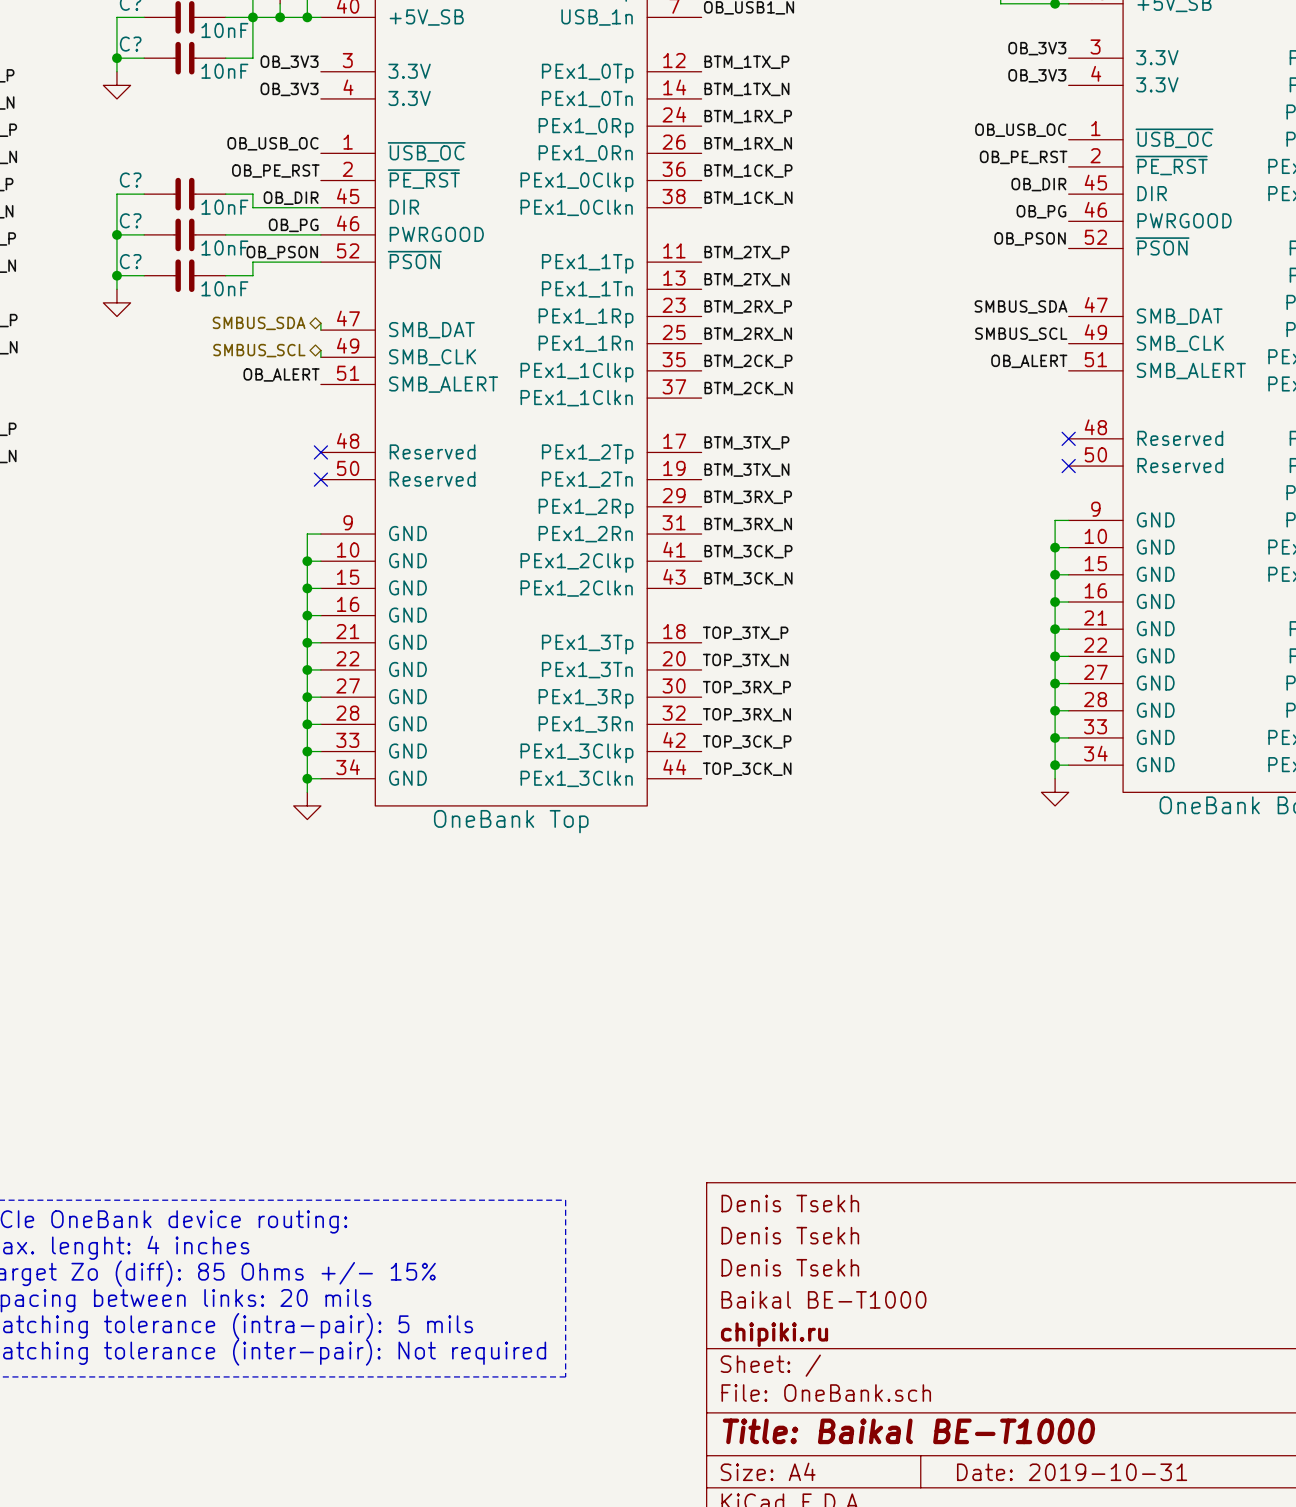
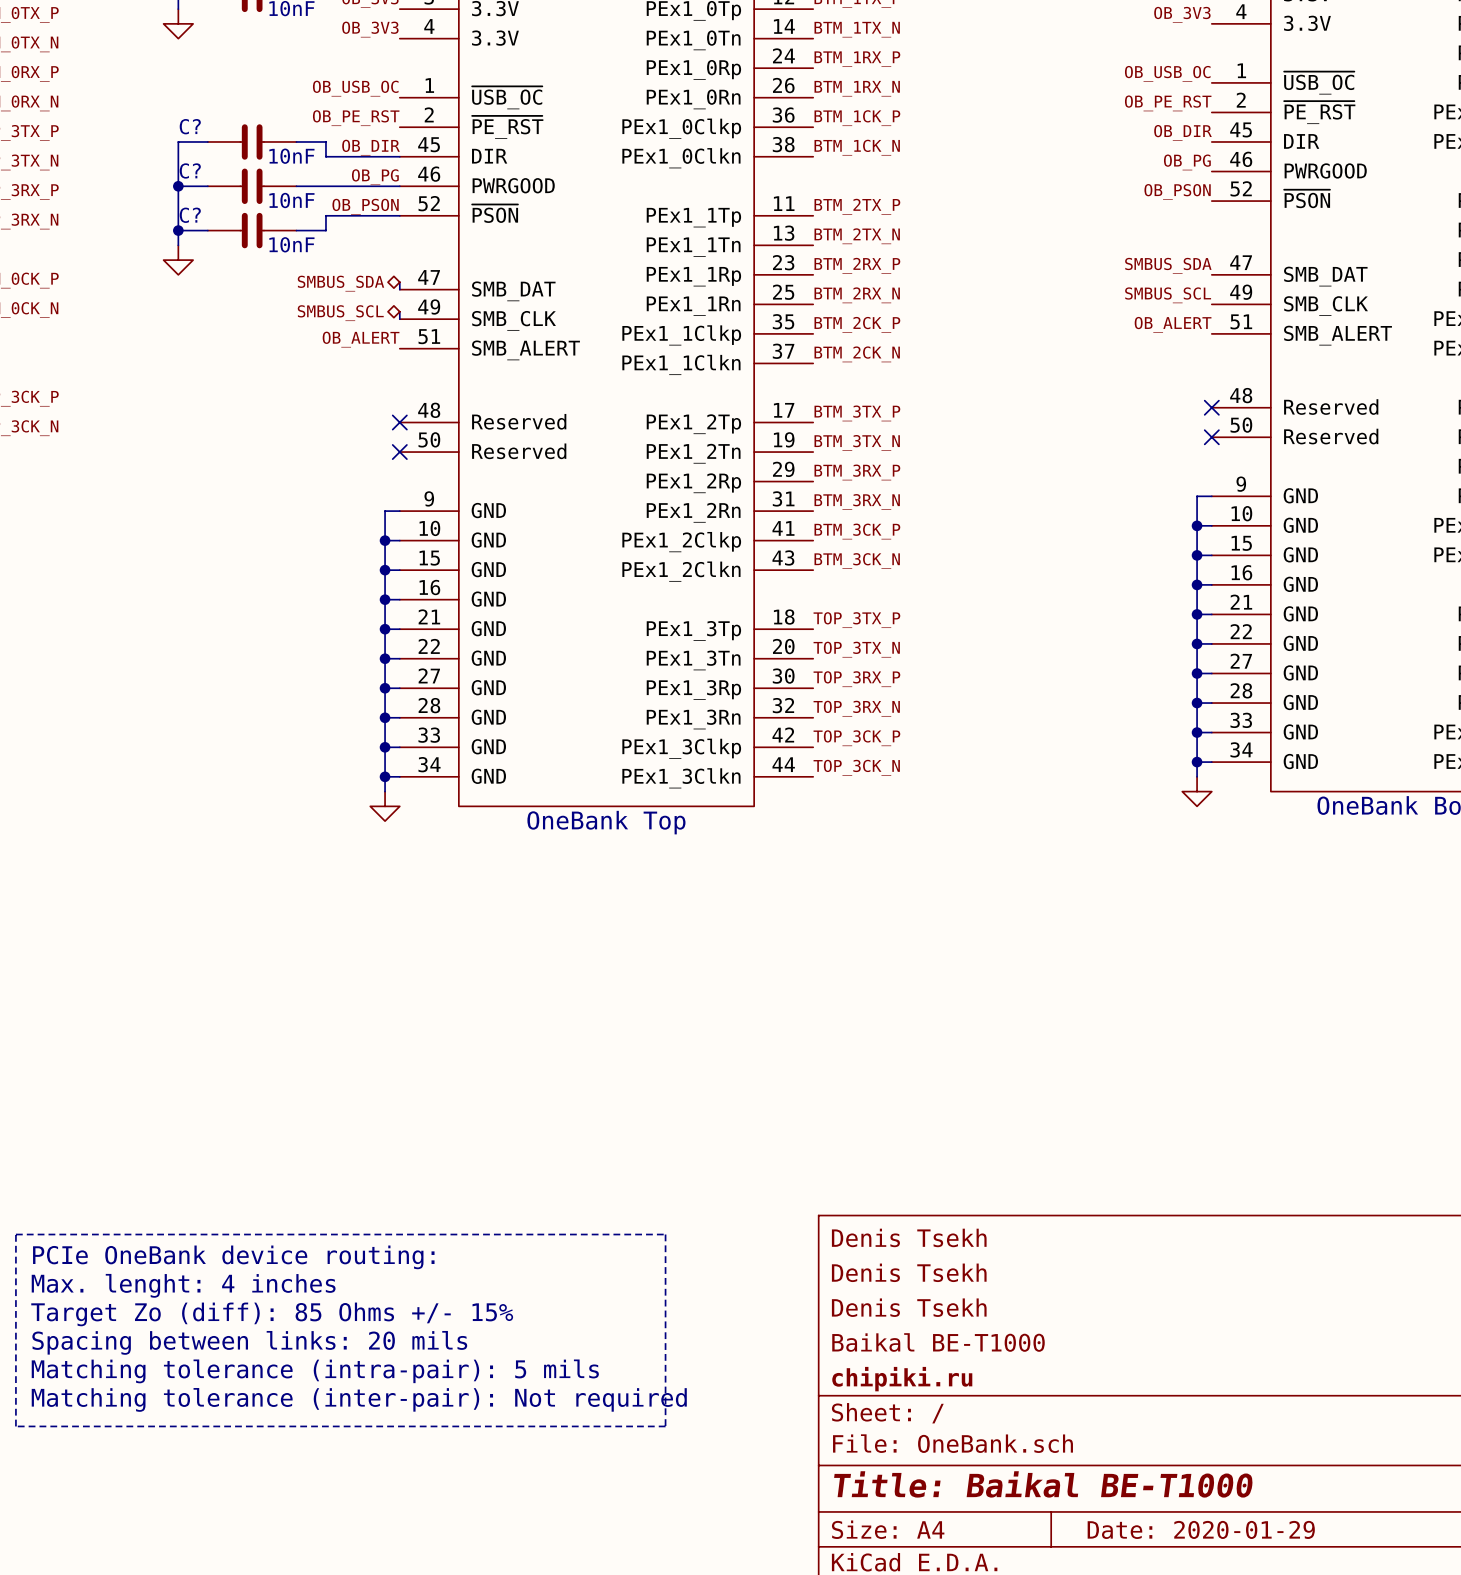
title block: Date: 2019-10-31 (1072, 1472) -> Date: 2020-01-29 (1201, 1529)

